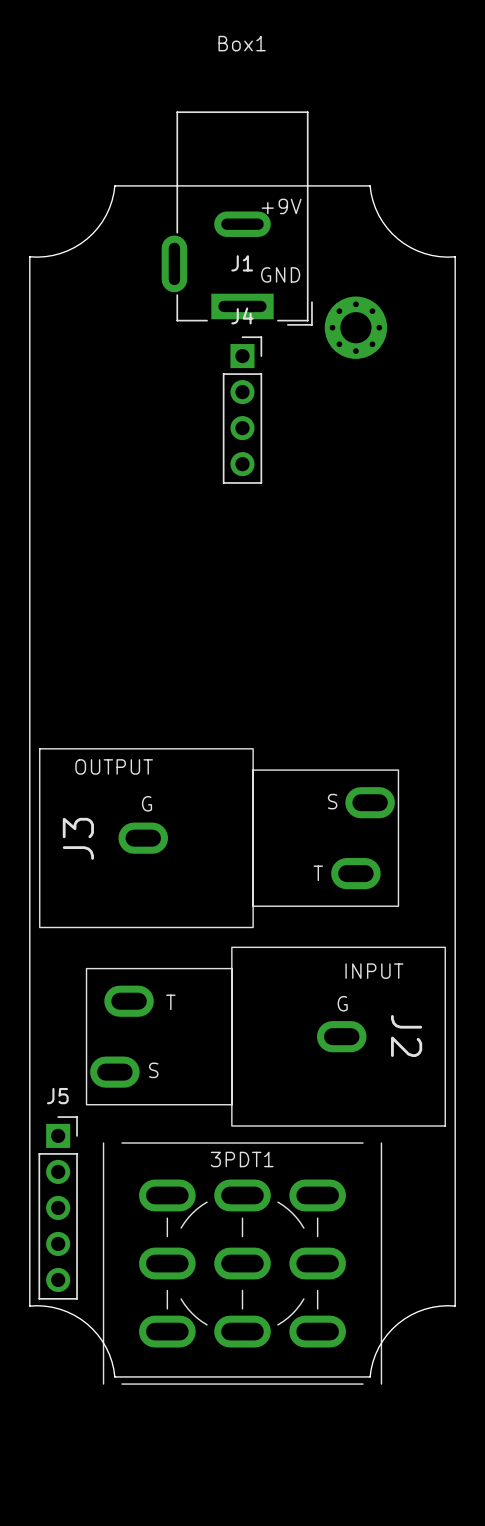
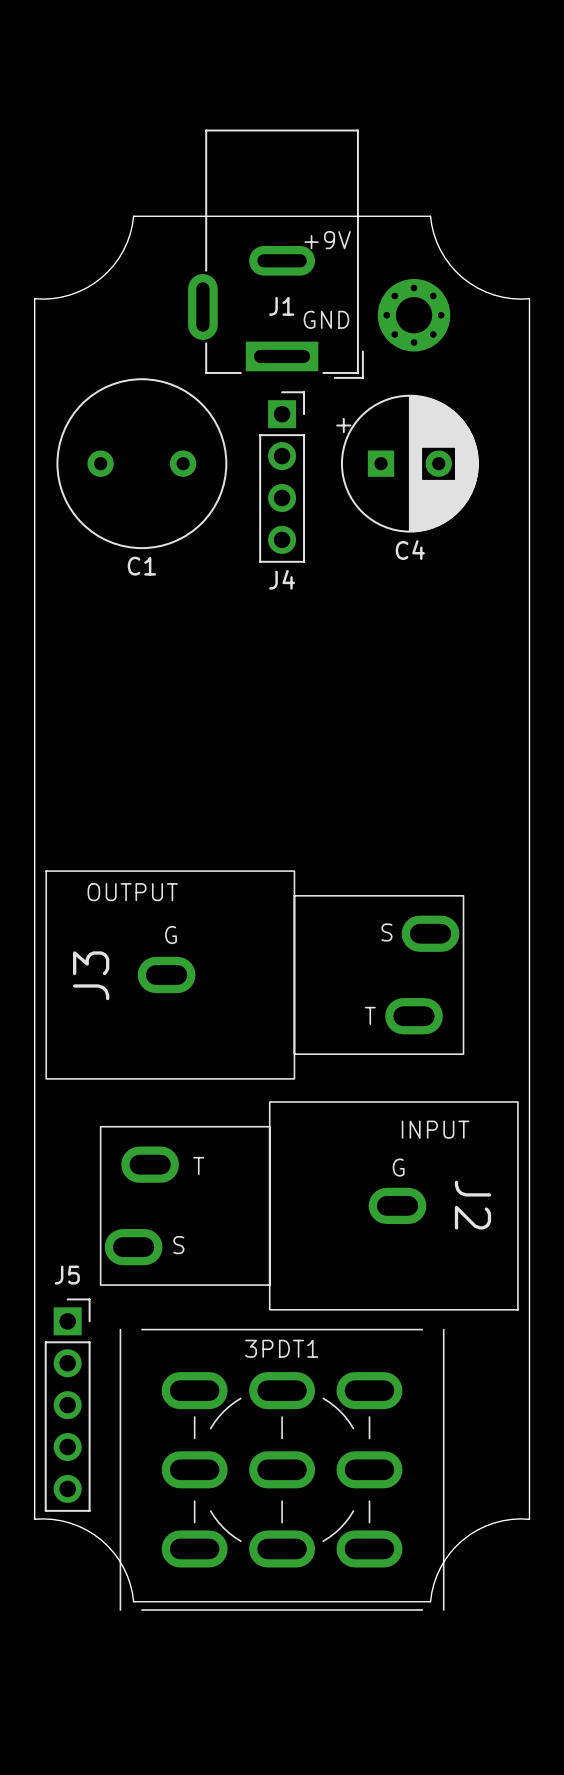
J4 name position: J4 (242, 315) -> J4 (282, 579)
part position: (355, 327) -> (414, 315)
C1: none -> (141, 463)
C4: none -> (407, 463)
Box1: (243, 1495) -> none

